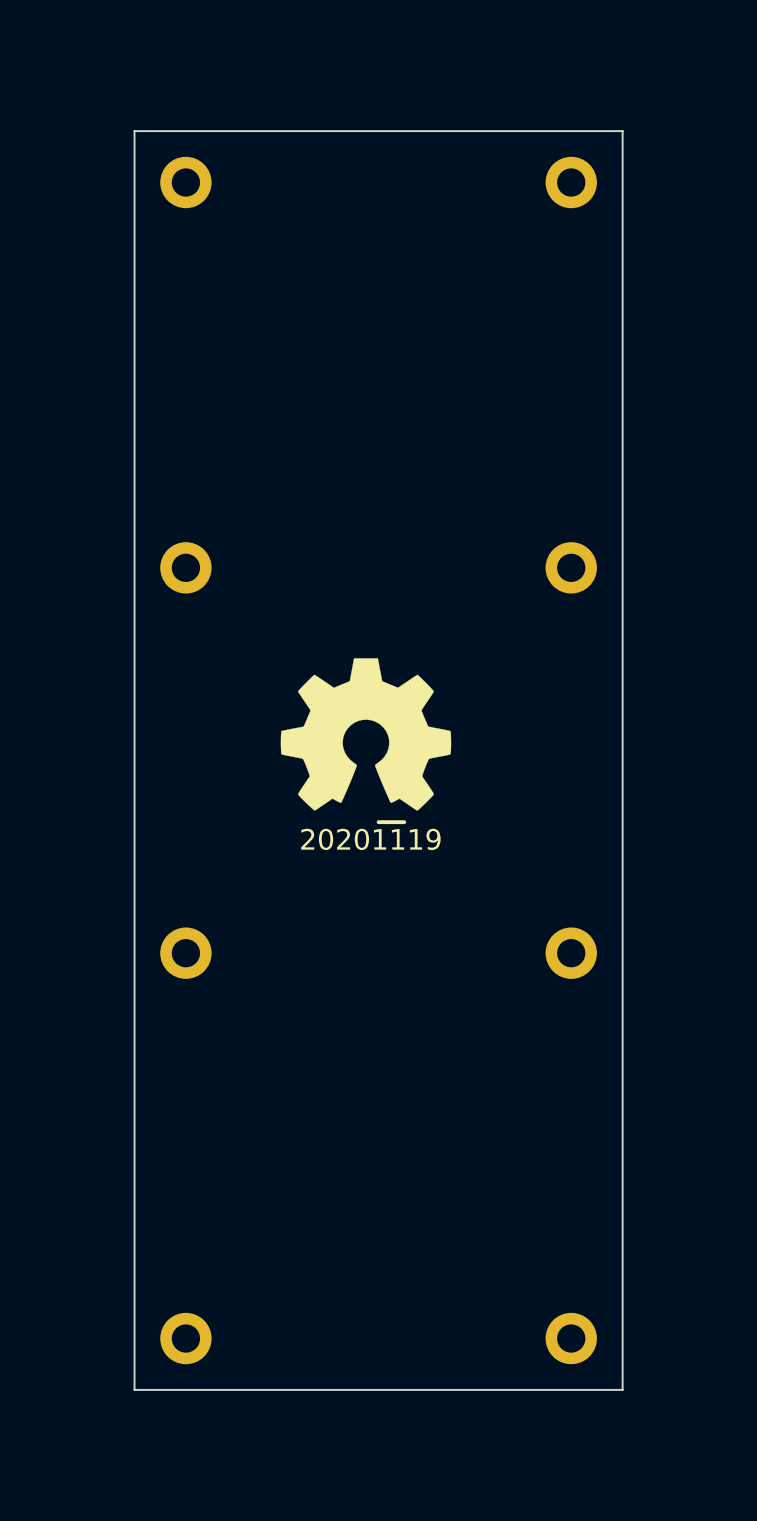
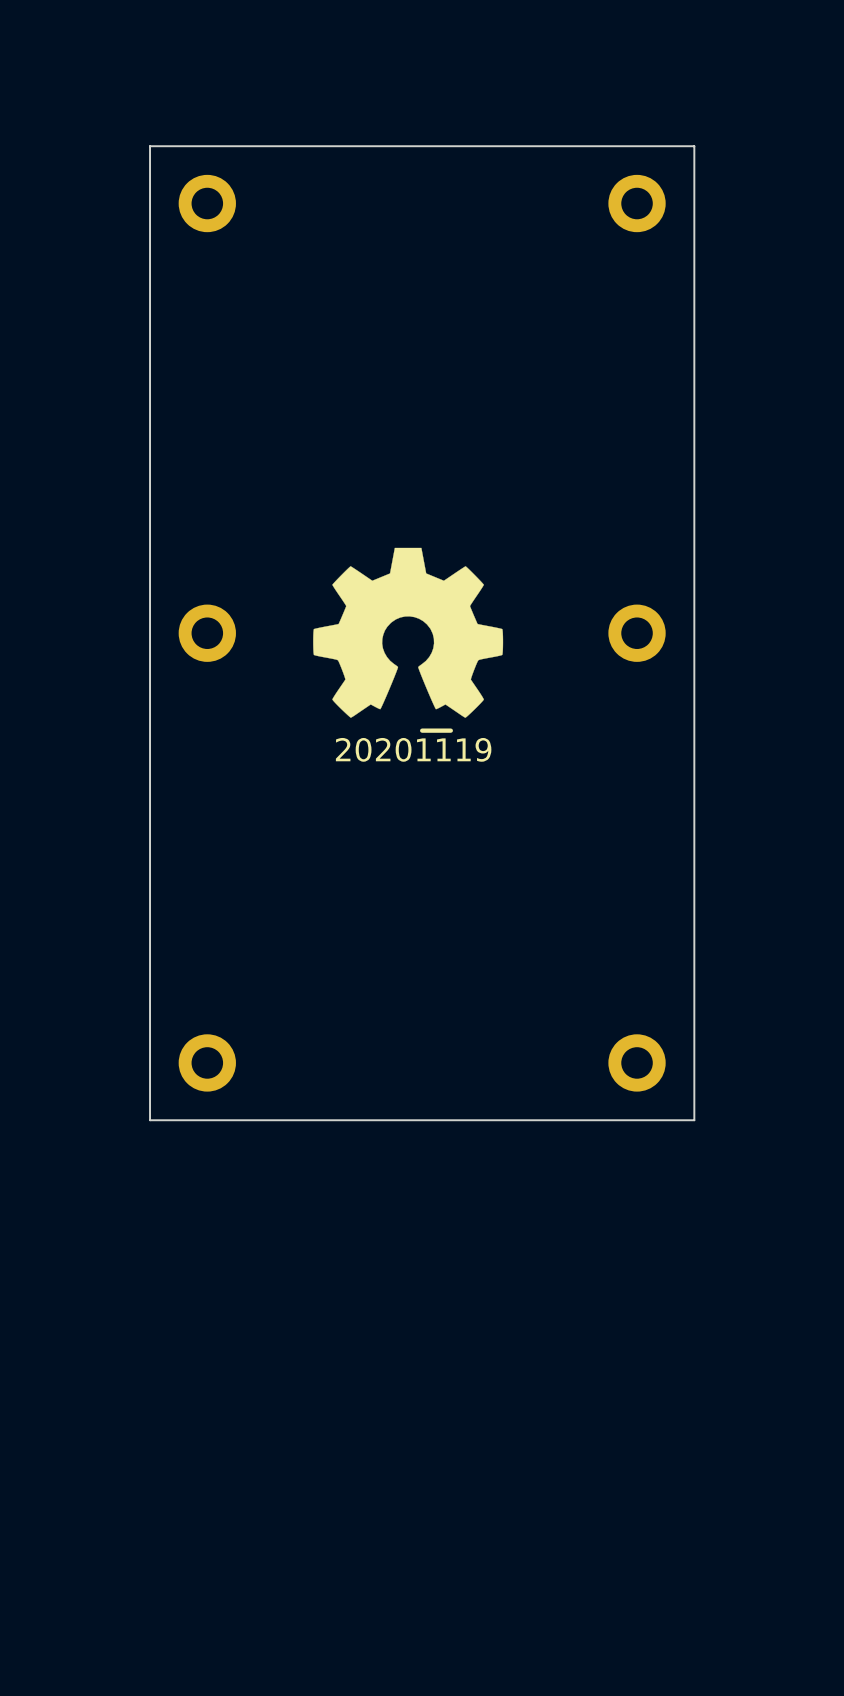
drawing position: (365, 734) -> (408, 632)
drawing position: (391, 822) -> (436, 730)
board edge: (622, 1004) (622, 1389) (134, 1389) (134, 1004) -> (694, 1120) (150, 1120)
part: (185, 1338) -> none
part: (571, 1338) -> none

